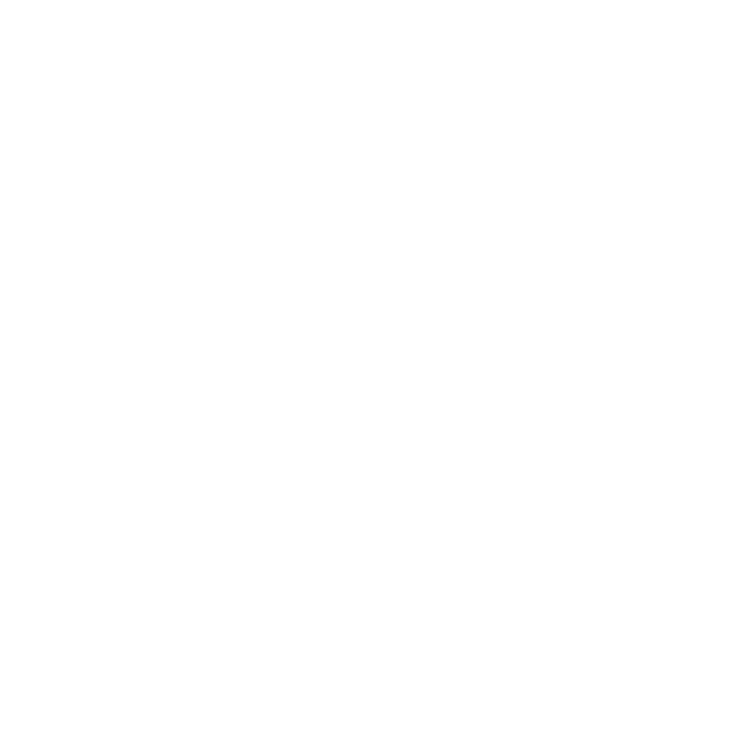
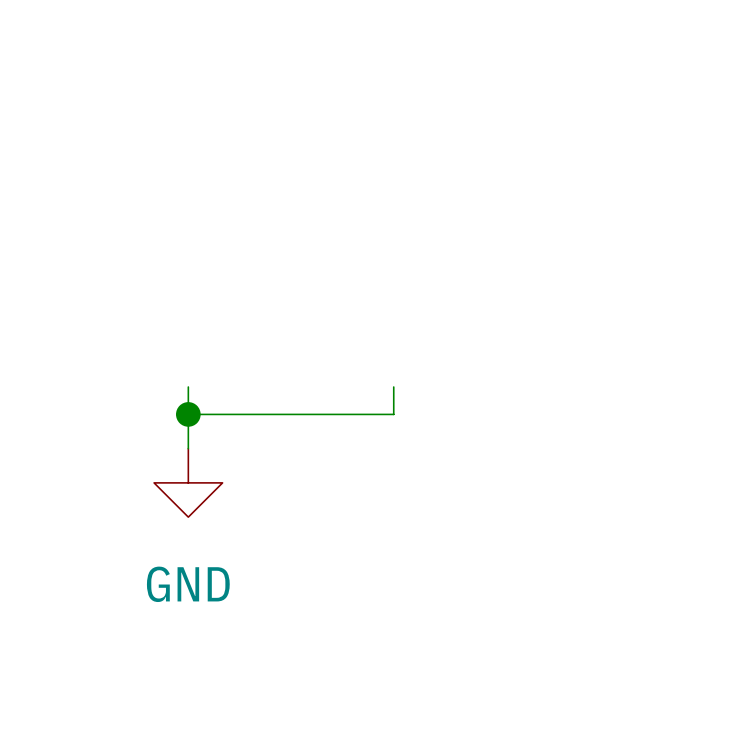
wire: none -> (188, 387) (188, 448)
wire: none -> (393, 387) (393, 414) (188, 414)
junction: none -> (188, 414)
power symbol: none -> GND (188, 482)

